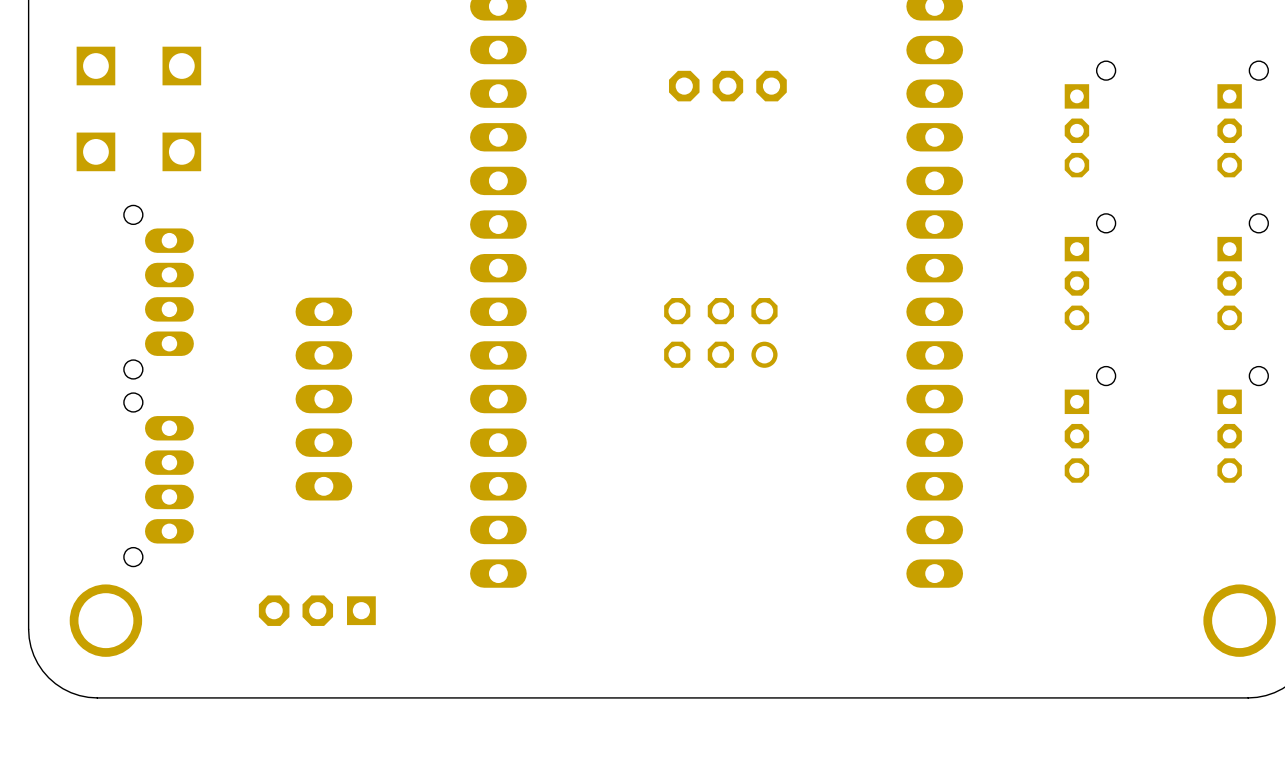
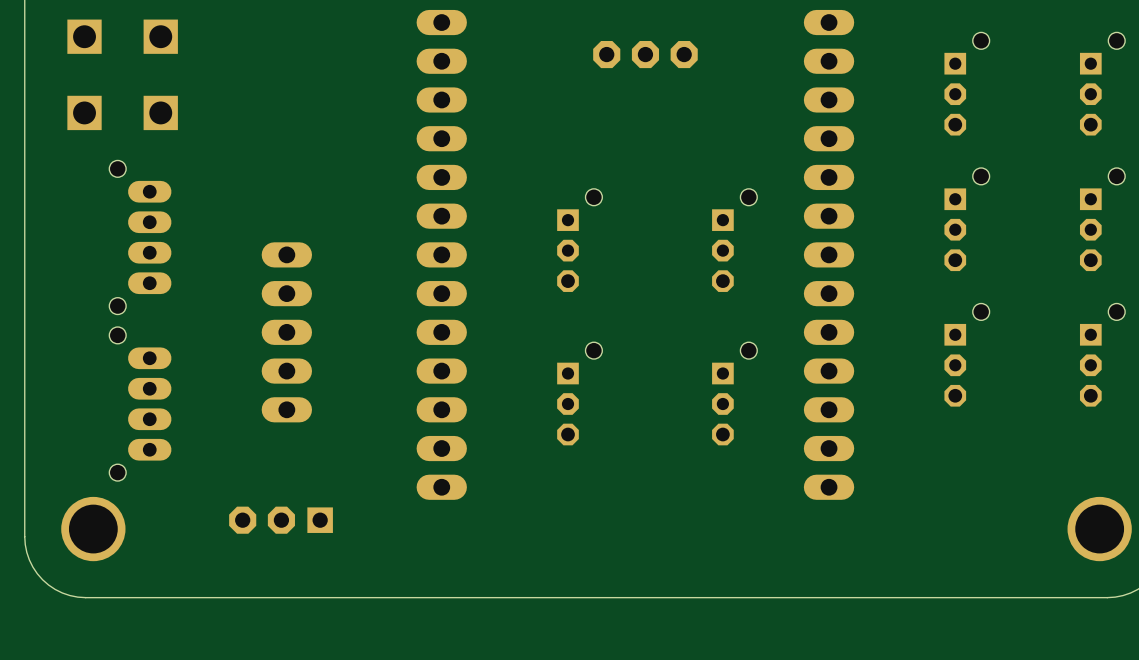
part: none -> (579, 240)
part: none -> (734, 240)
part: (720, 332) -> none
part: none -> (579, 393)
part: none -> (734, 393)

